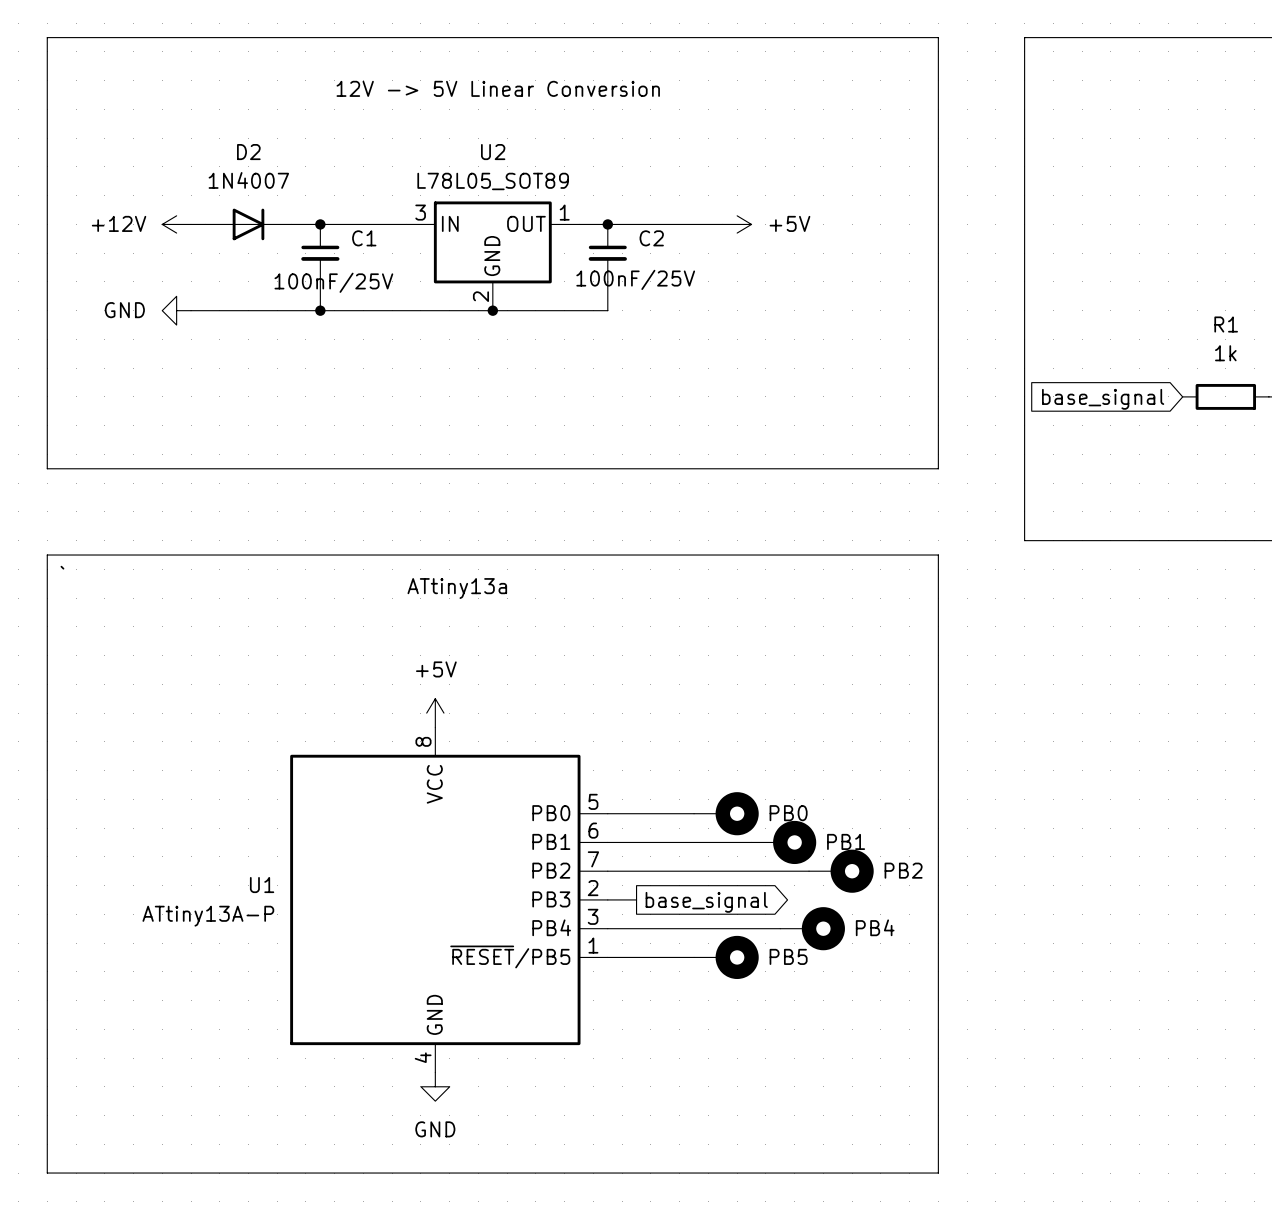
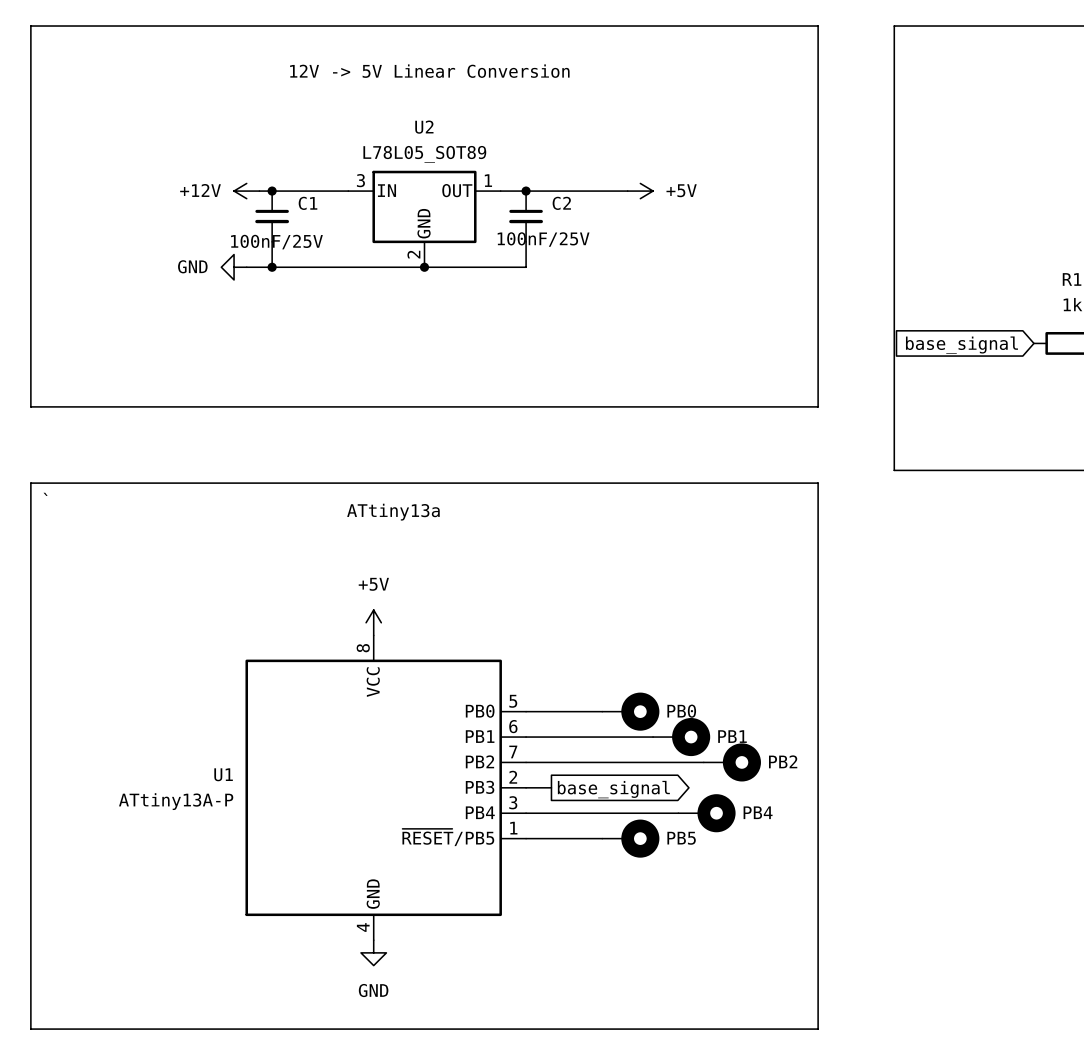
power symbol position: +12V (176, 224) -> +12V (246, 191)
wire: (191, 224) (205, 224) -> none
D2: 1N4007 (248, 224) -> none
power symbol position: GND (176, 310) -> GND (234, 267)
wire: (191, 310) (291, 310) -> none

